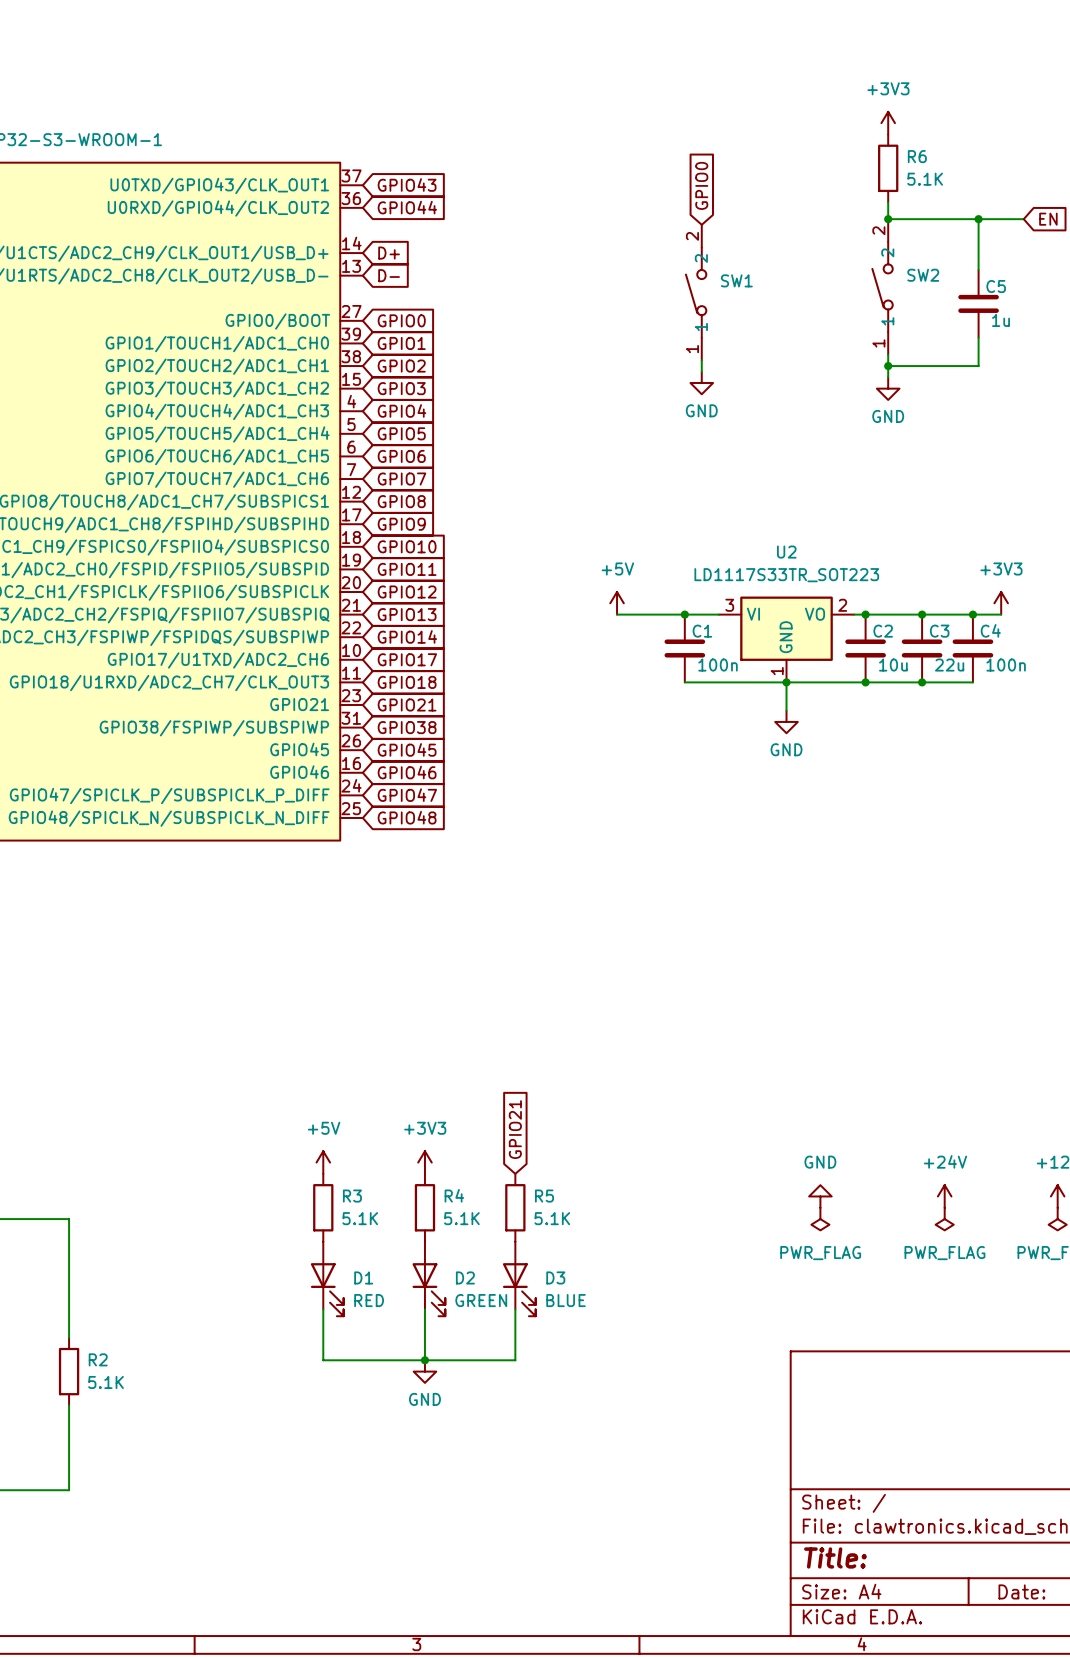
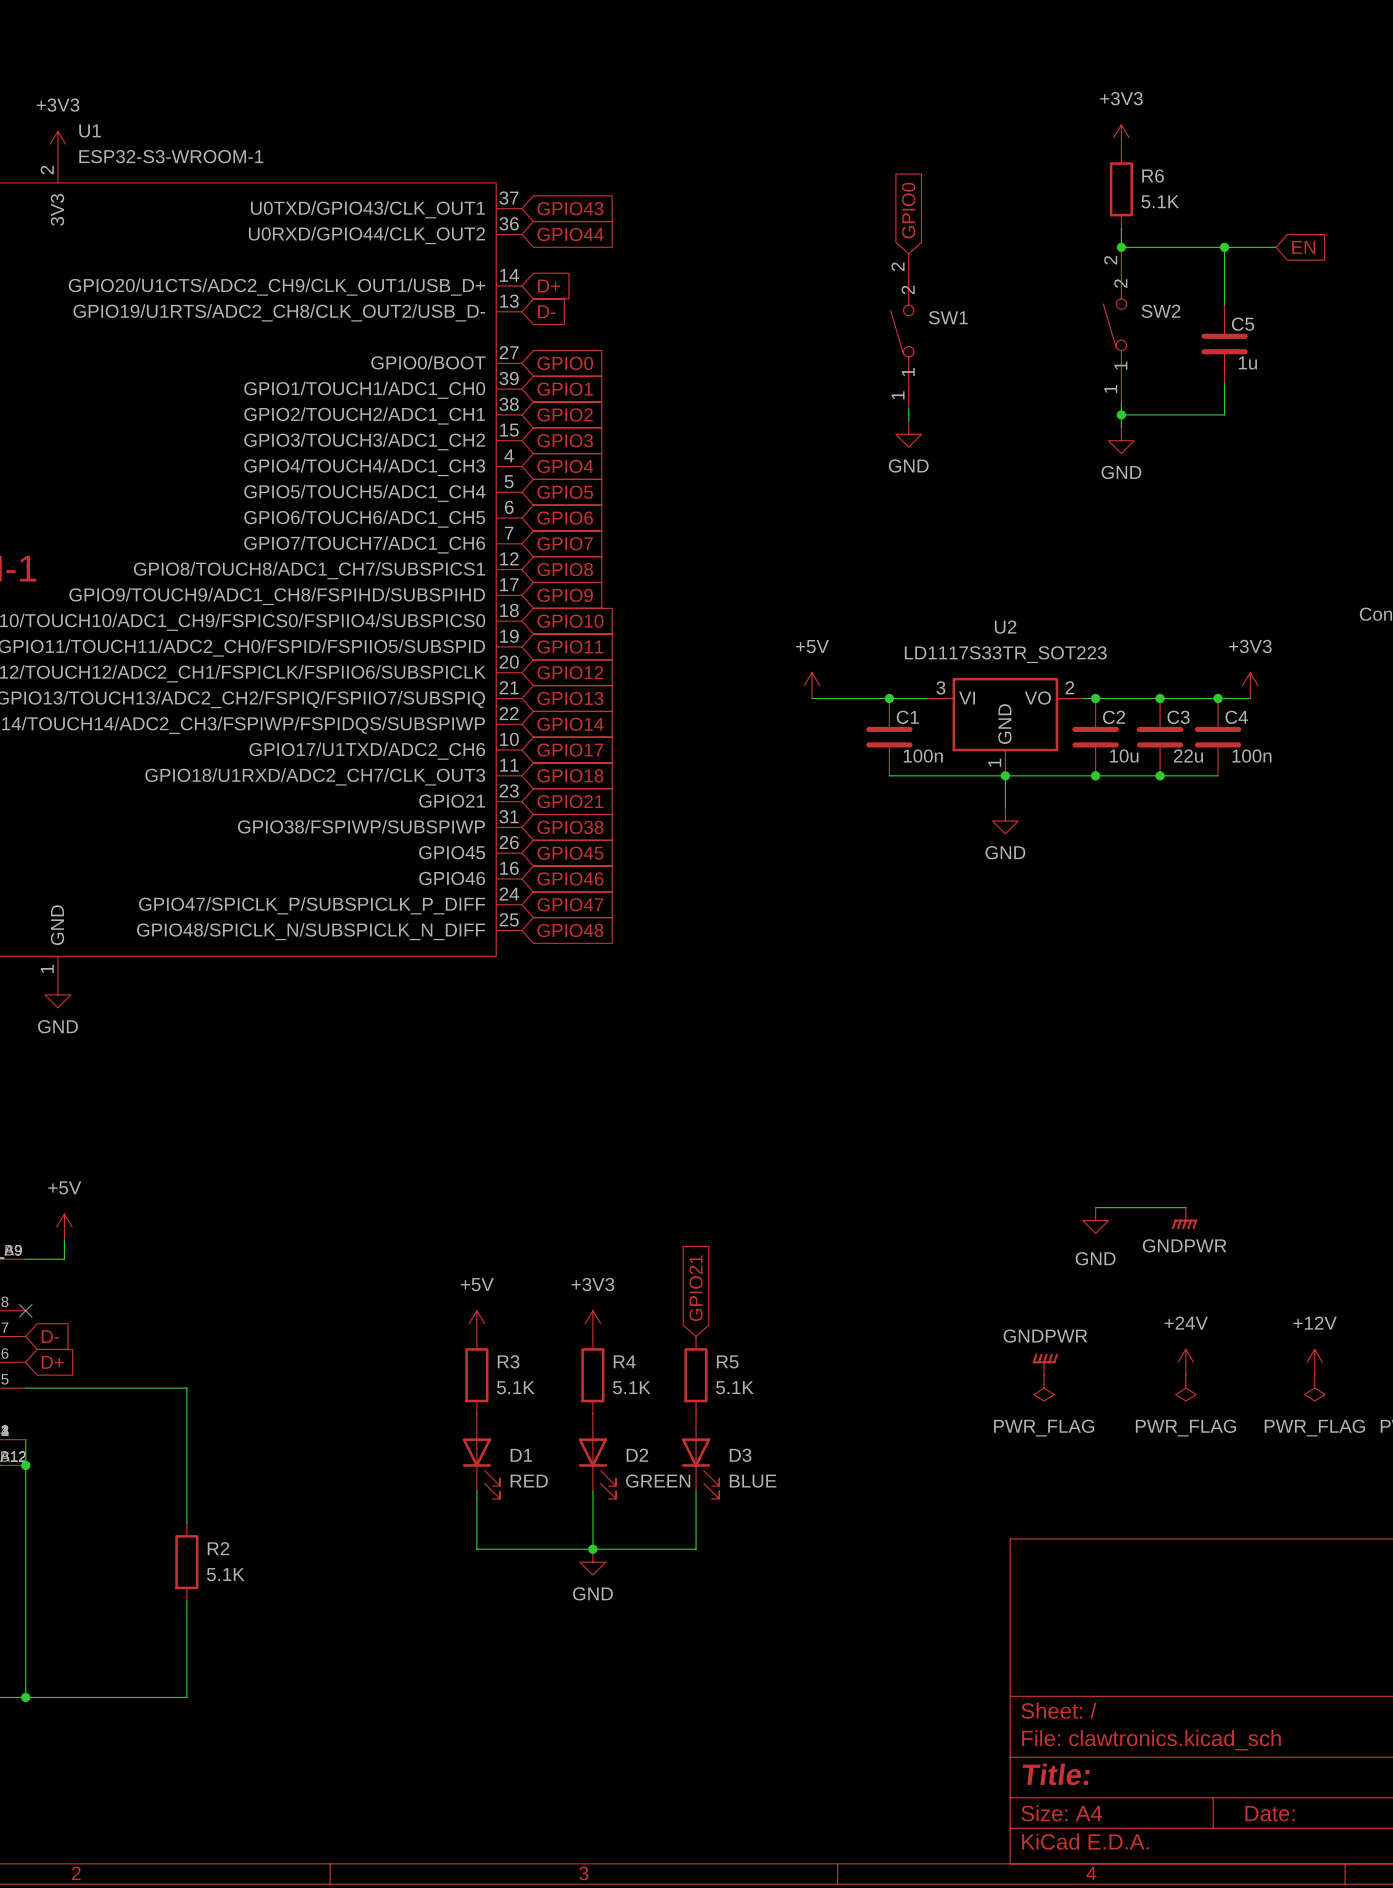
wire: none -> (1095, 1207) (1185, 1207)
power symbol: none -> GNDPWR (1184, 1218)
power symbol: none -> GND (1095, 1220)
power symbol: GND (820, 1196) -> GNDPWR (1045, 1364)

